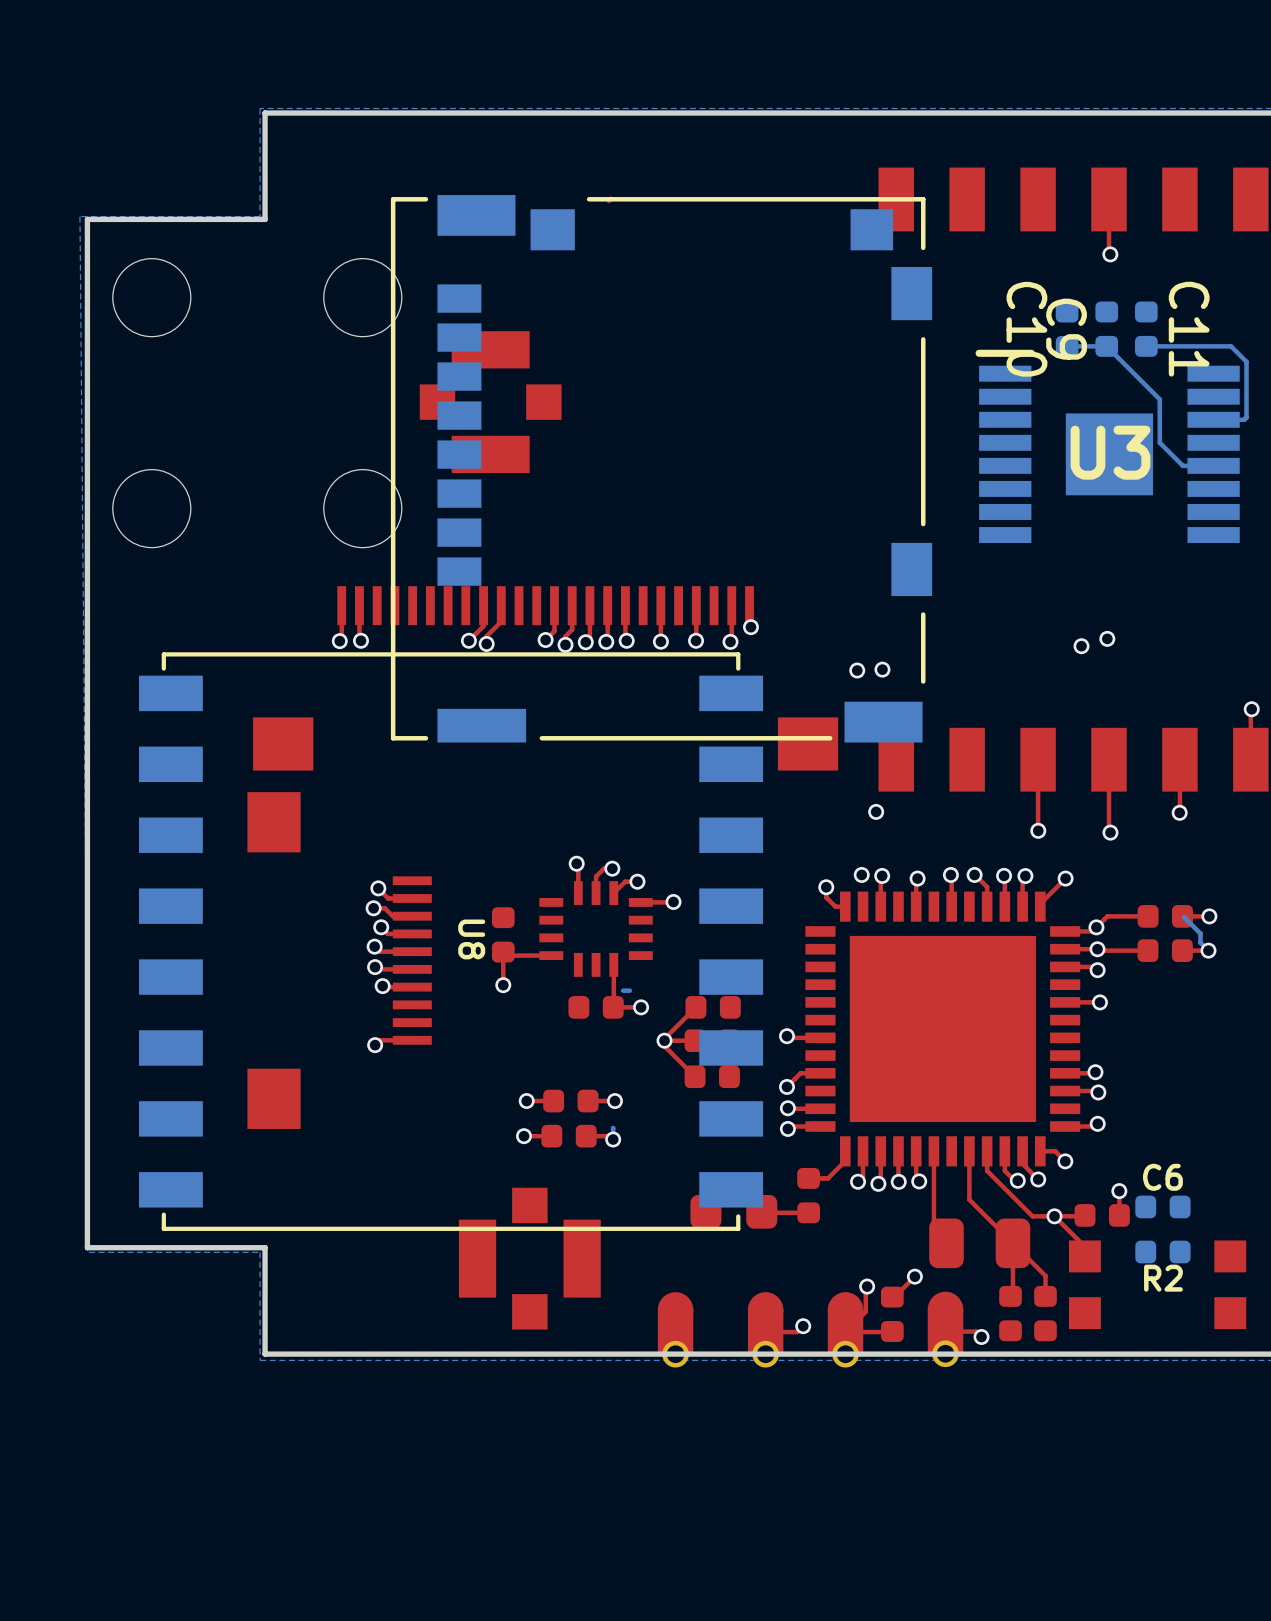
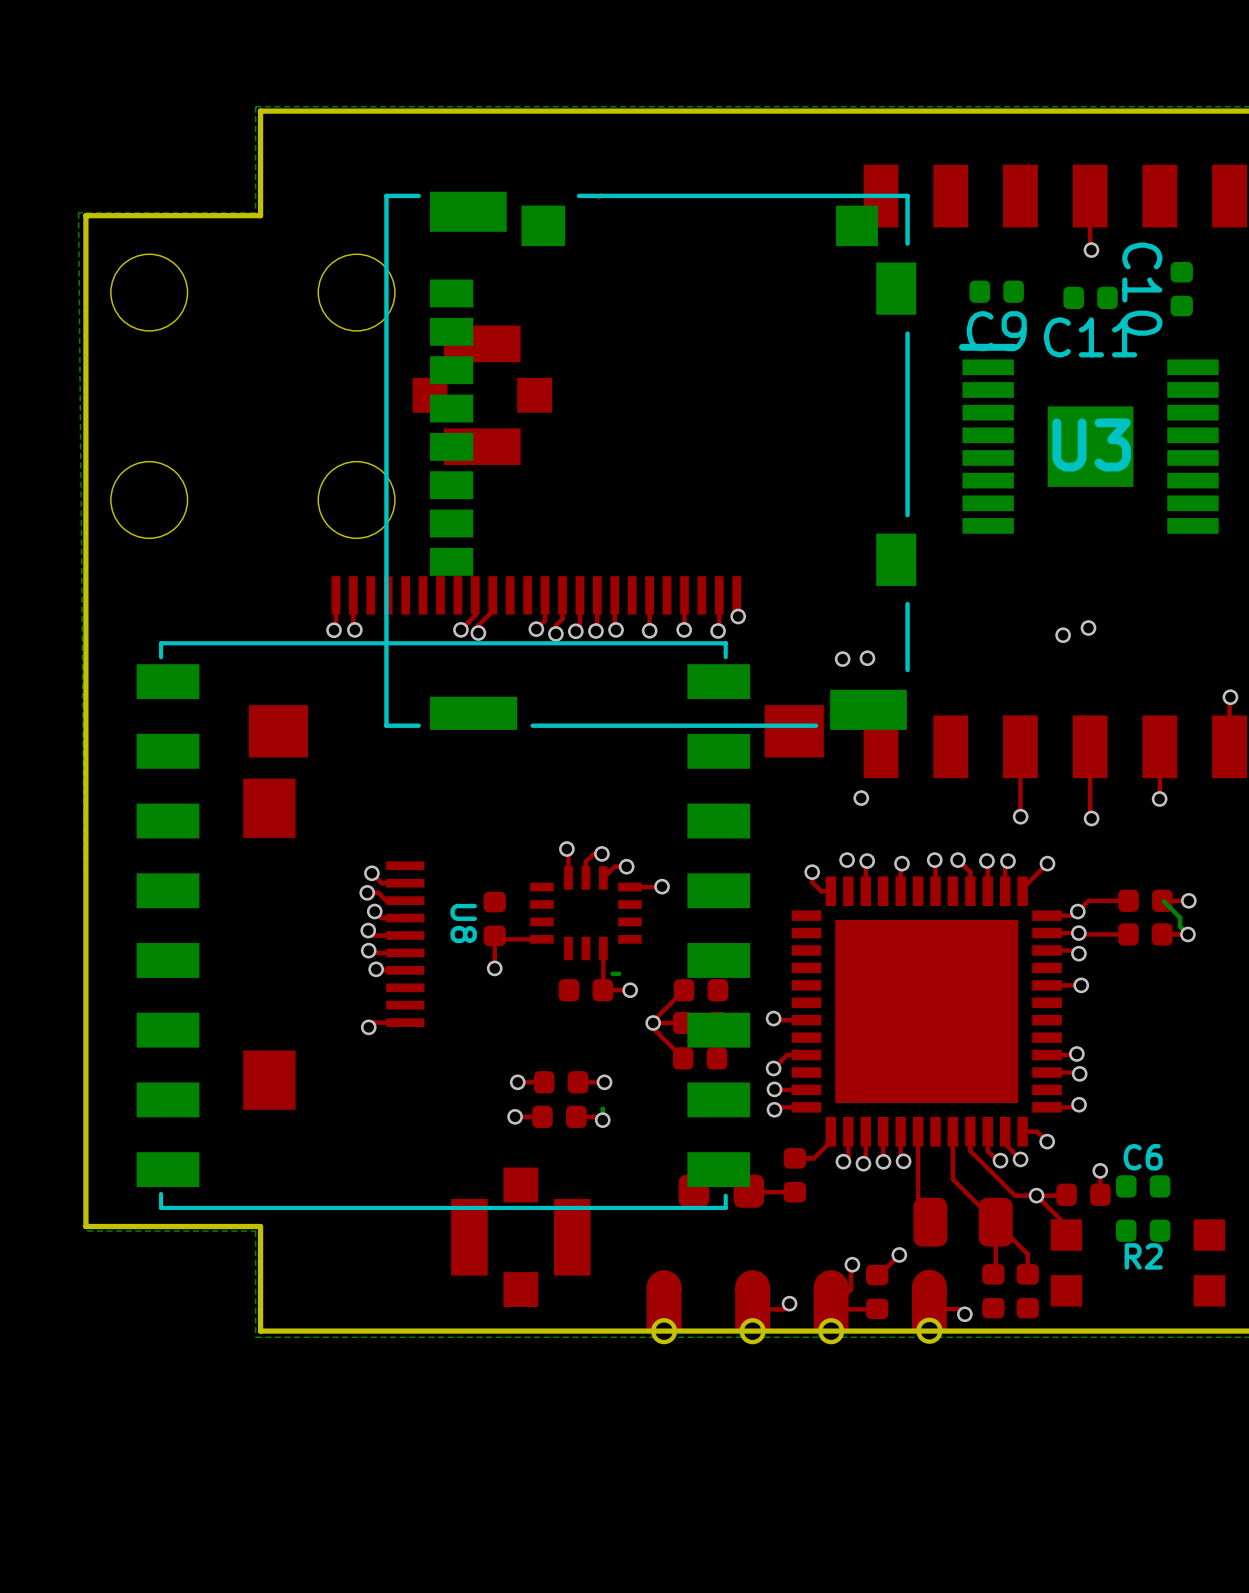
C10 position: (1067, 329) -> (1181, 289)
C9 rotation: 0° (1106, 329) -> 90° clockwise (996, 291)
C9 position: (1106, 329) -> (996, 291)
C11 rotation: 0° (1146, 329) -> 90° clockwise (1090, 297)
C11 position: (1146, 329) -> (1090, 297)
bottom track: (1067, 346) (1106, 346) (1159, 399) (1159, 442) (1182, 465) (1213, 465) -> none
bottom track: (1146, 346) (1231, 346) (1246, 361) (1246, 417) (1244, 419) (1213, 419) -> none

